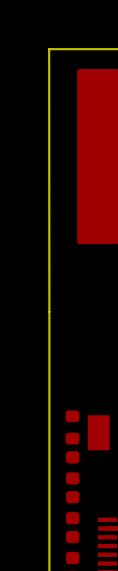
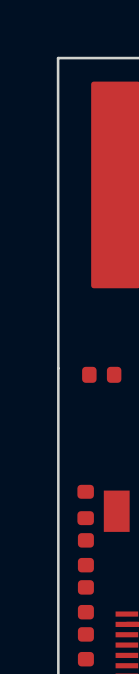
part: none -> (101, 374)

